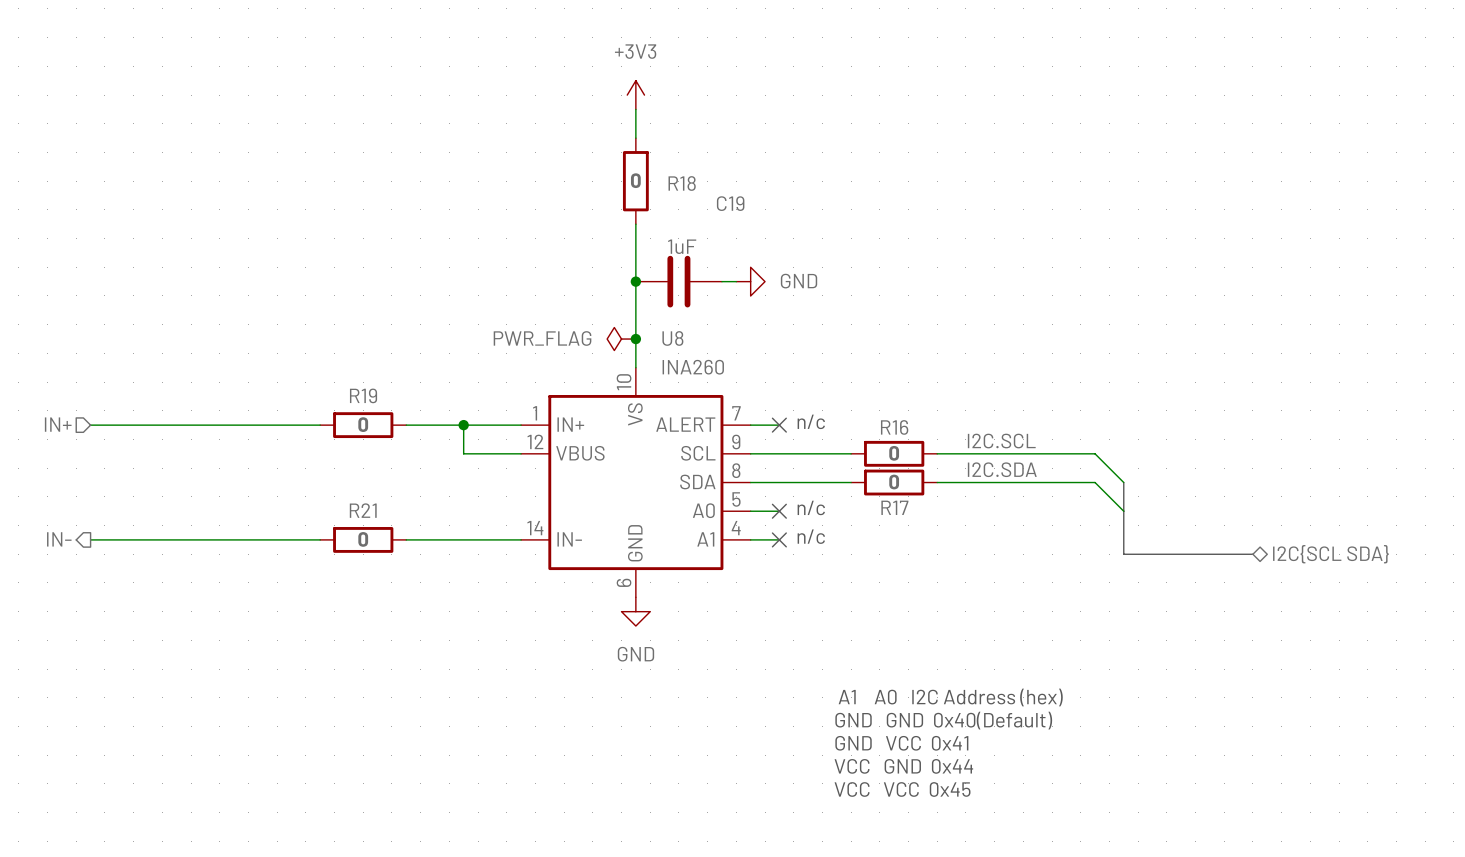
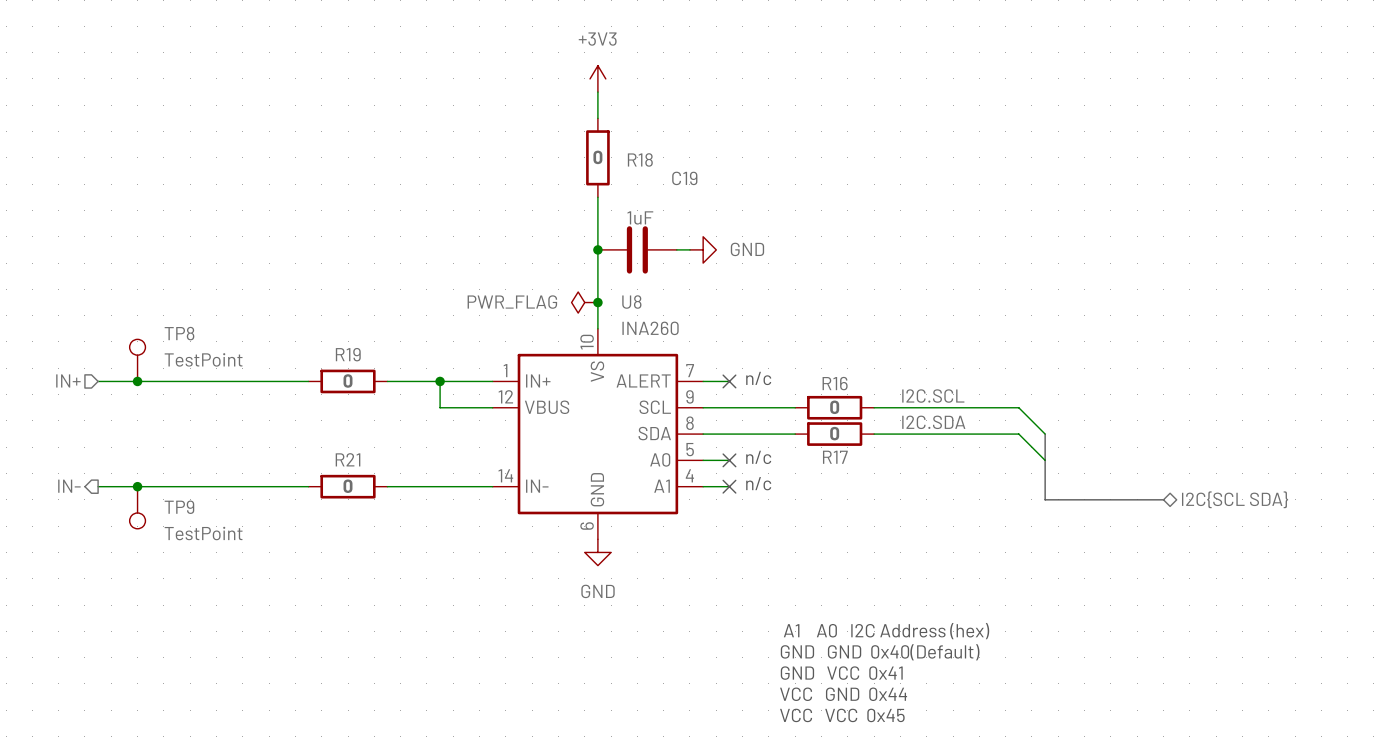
TP8: none -> TestPoint (137, 360)
junction: none -> (137, 381)
junction: none -> (137, 486)
TP9: none -> TestPoint (137, 507)

